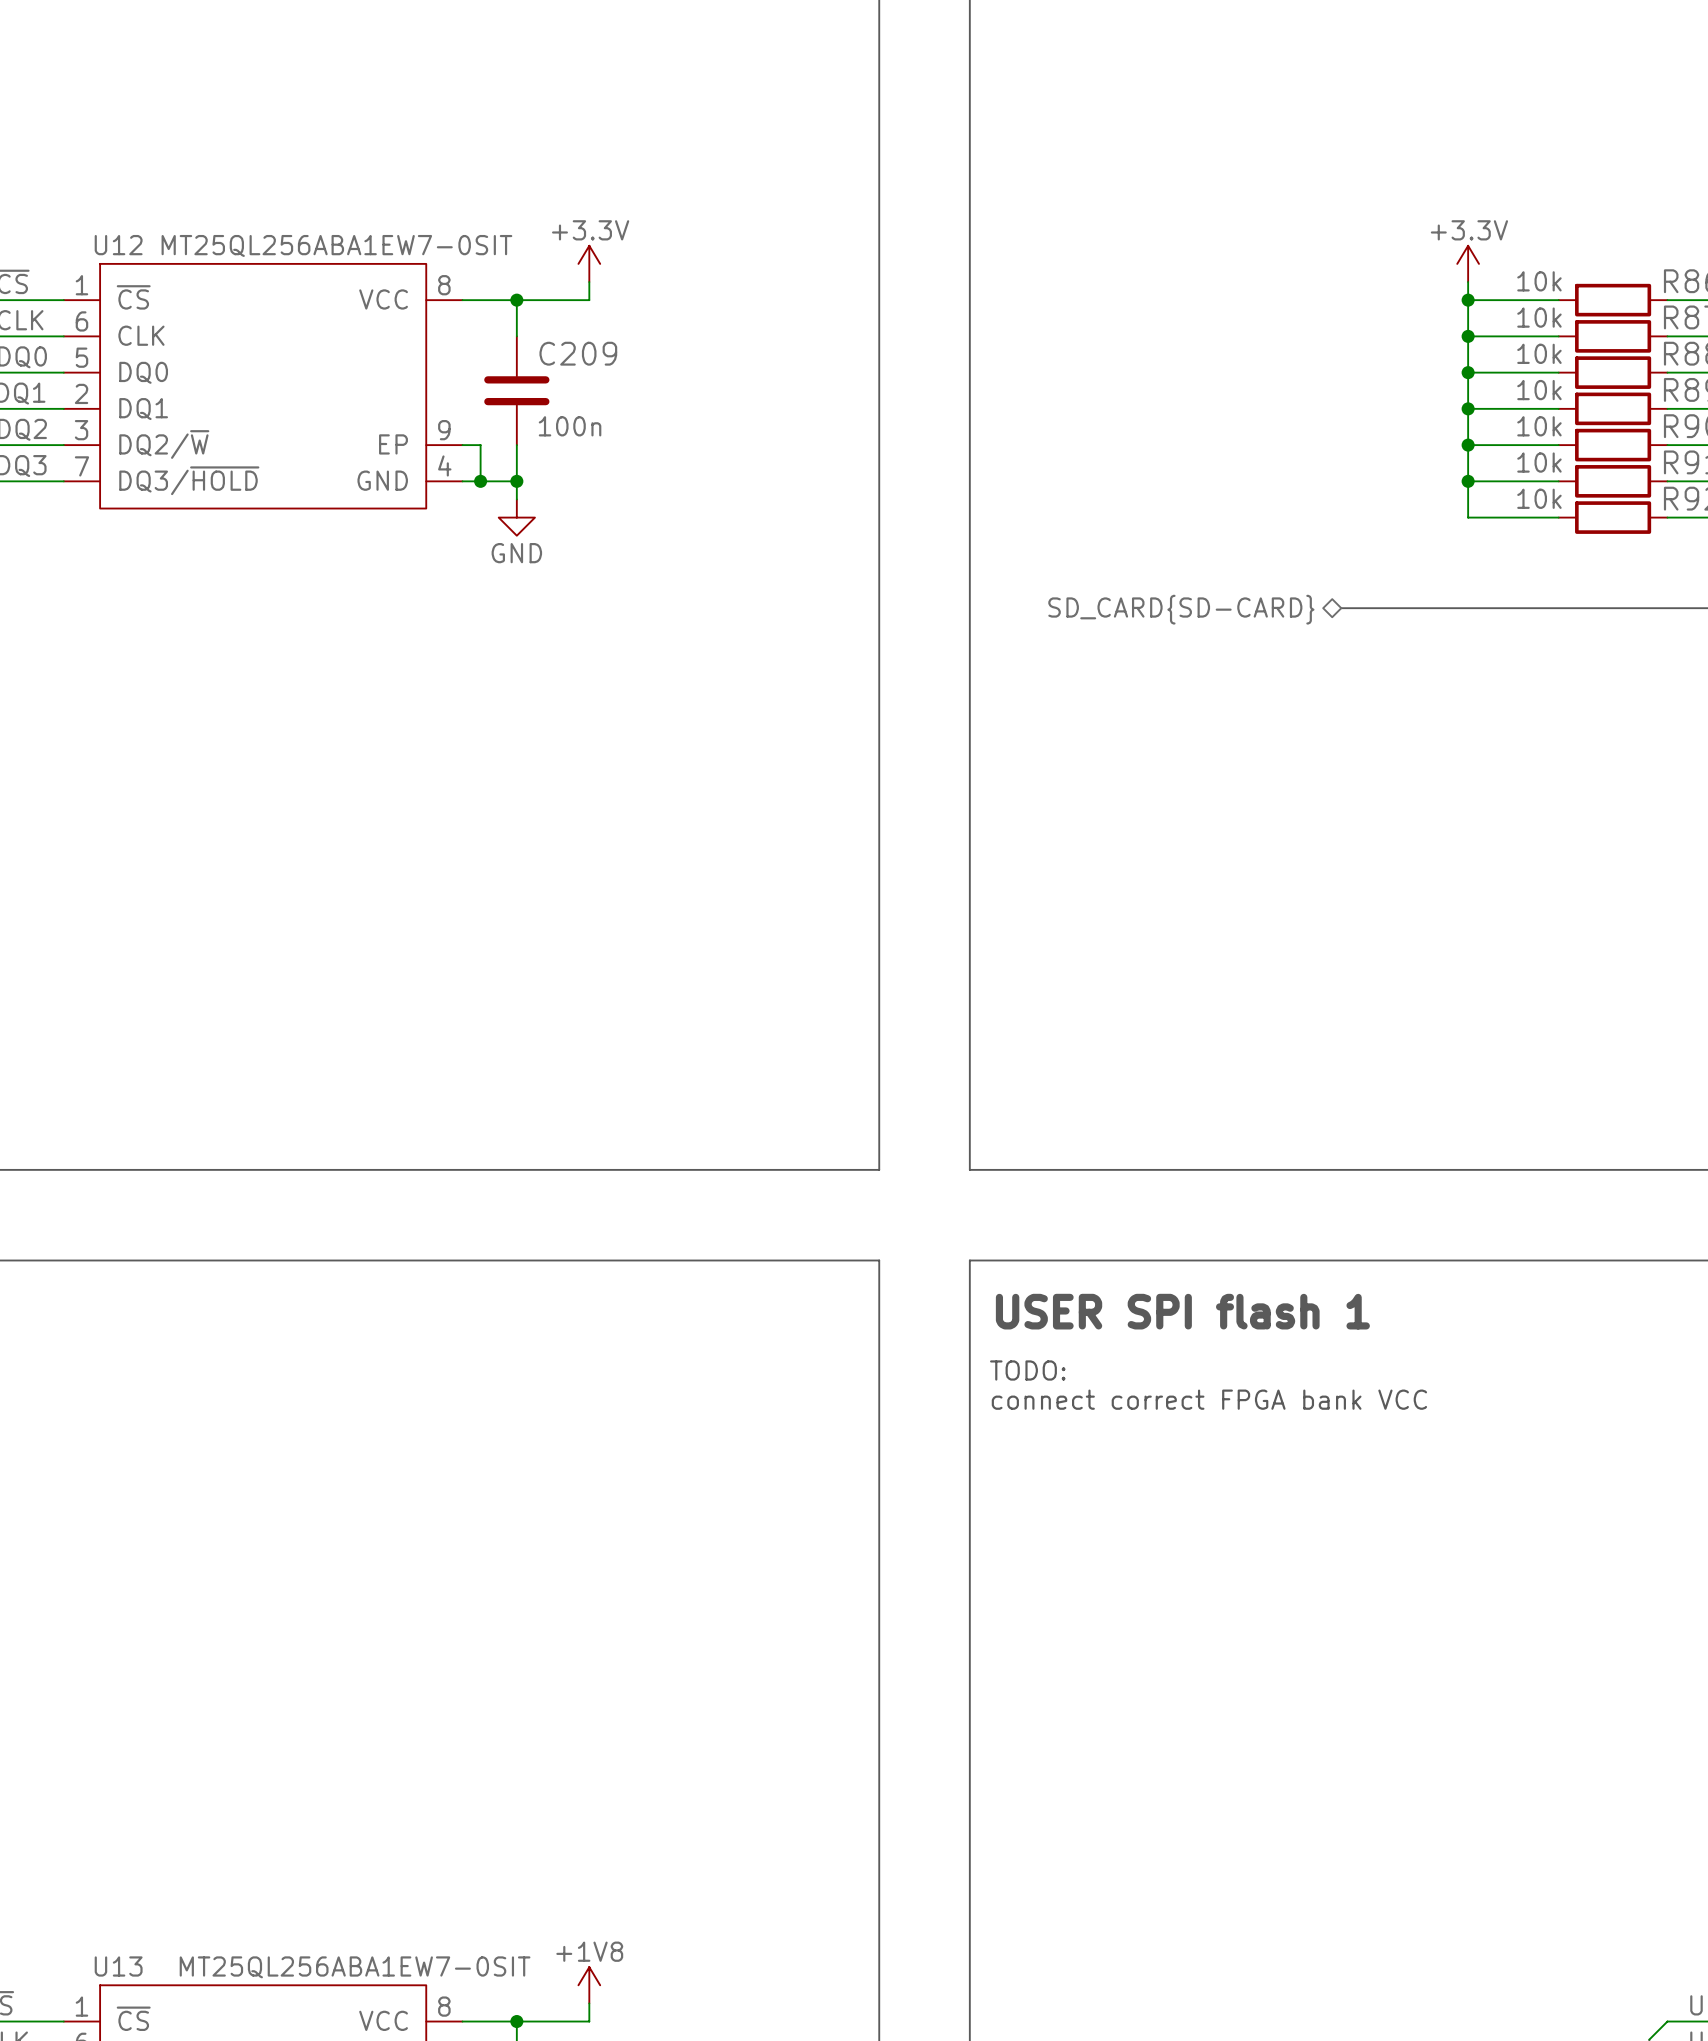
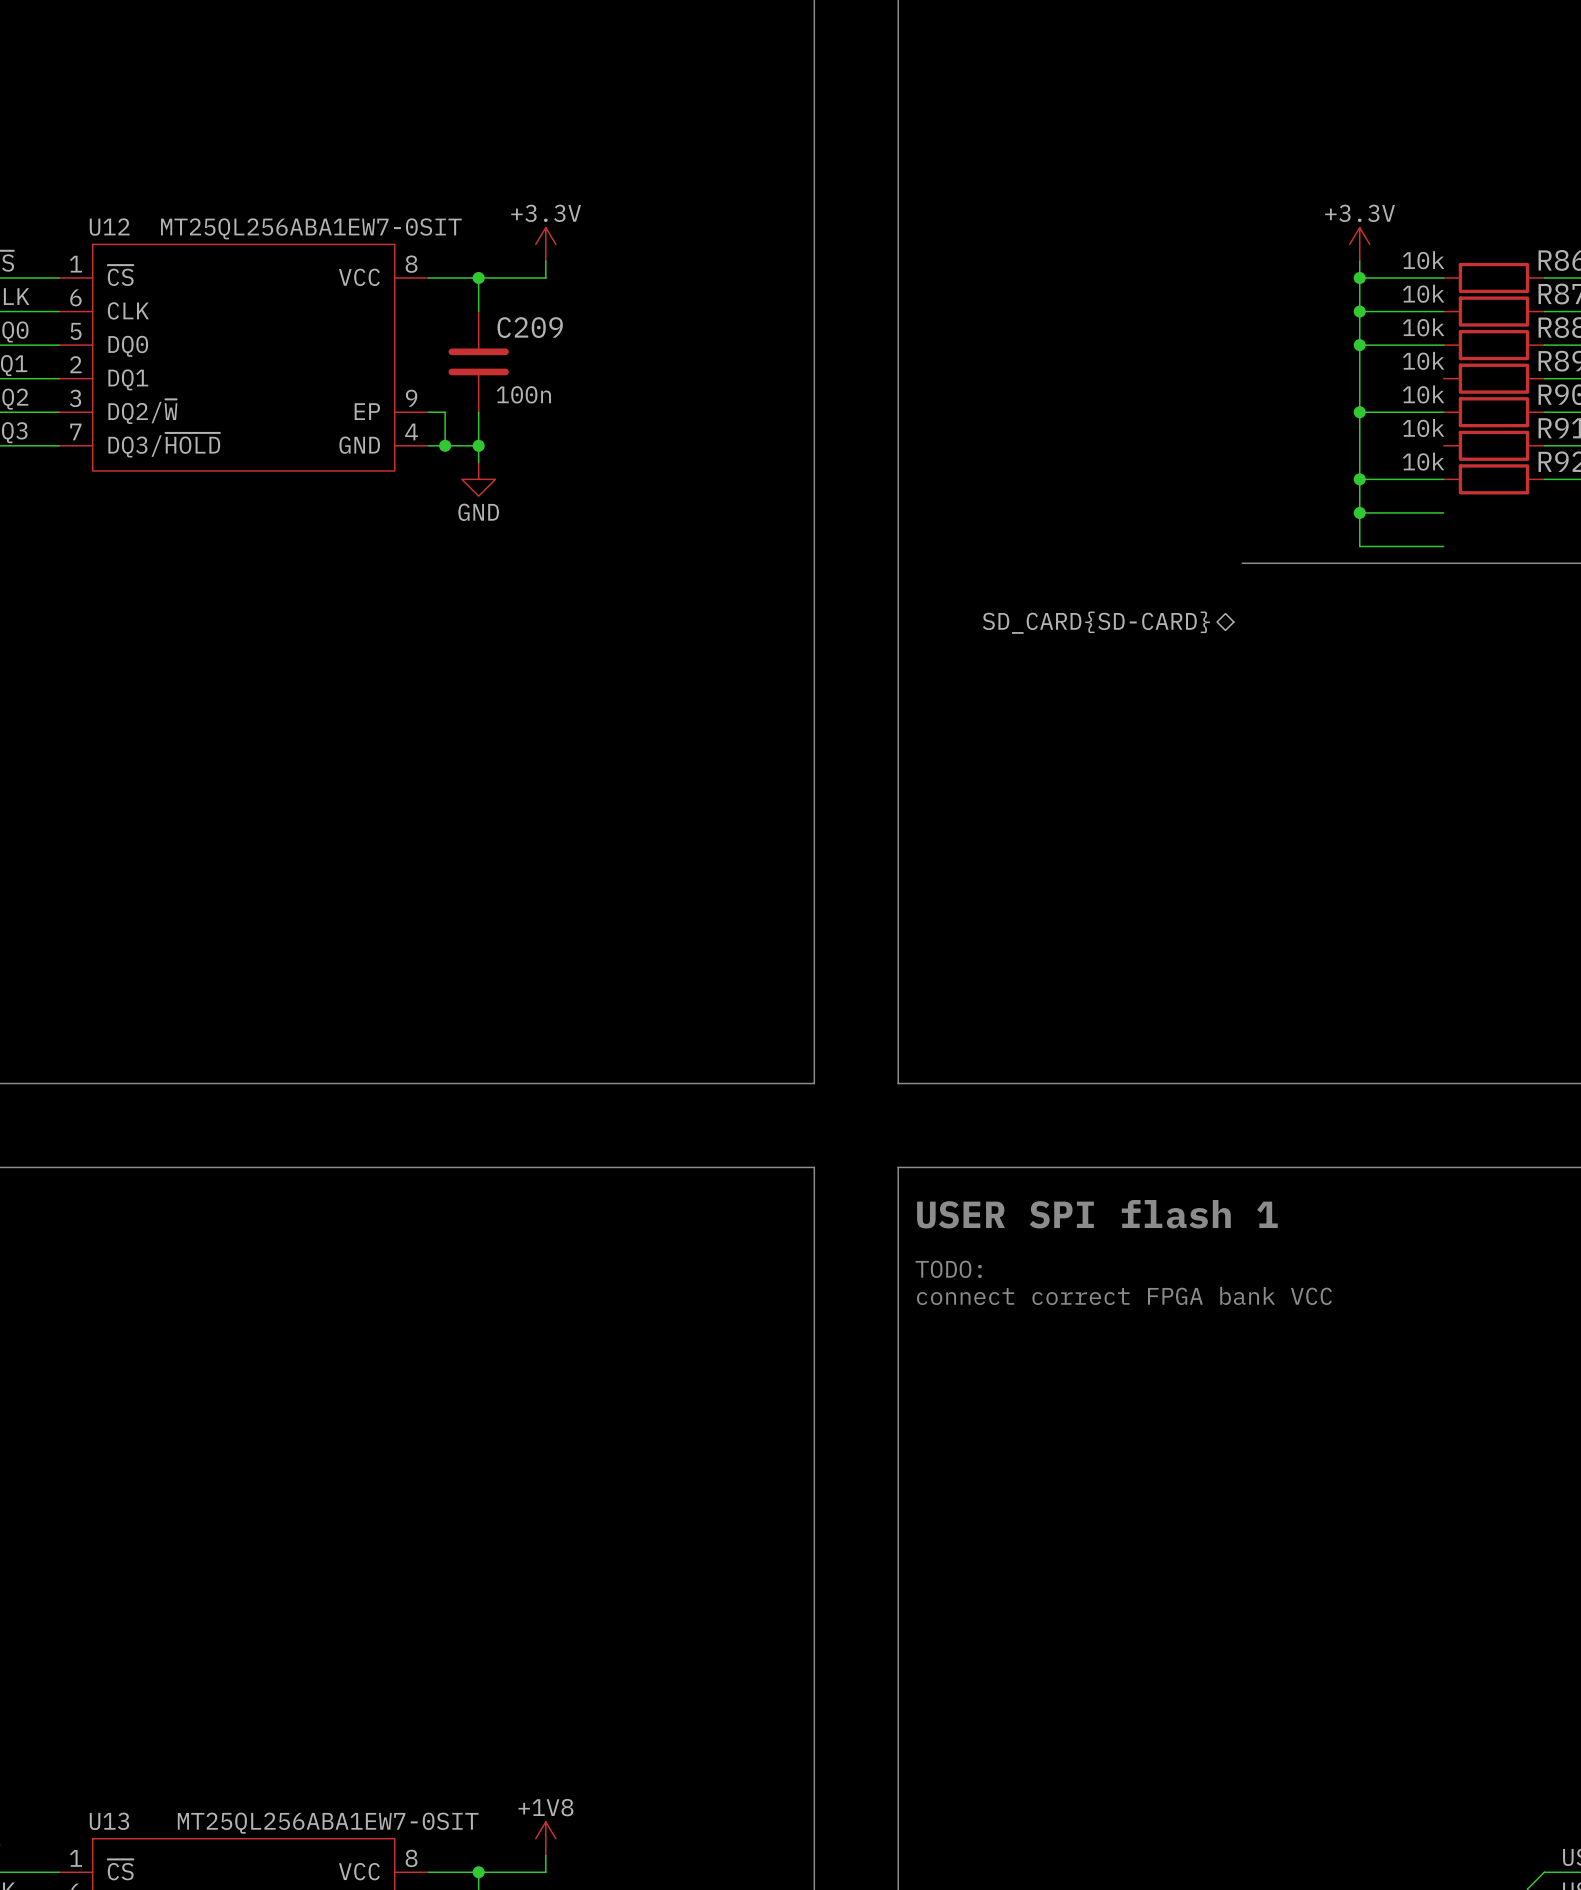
wire: (1468, 408) (1558, 408) -> none
junction: (1468, 408) -> none
wire: (1468, 481) (1558, 481) -> (1359, 512) (1443, 512)
junction: (1468, 481) -> none
wire: none -> (1359, 479) (1359, 546) (1443, 546)
junction: none -> (1359, 479)
junction: none -> (1359, 512)
hierarchical label position: SD_CARD{SD-CARD} (1181, 609) -> SD_CARD{SD-CARD} (1096, 622)

